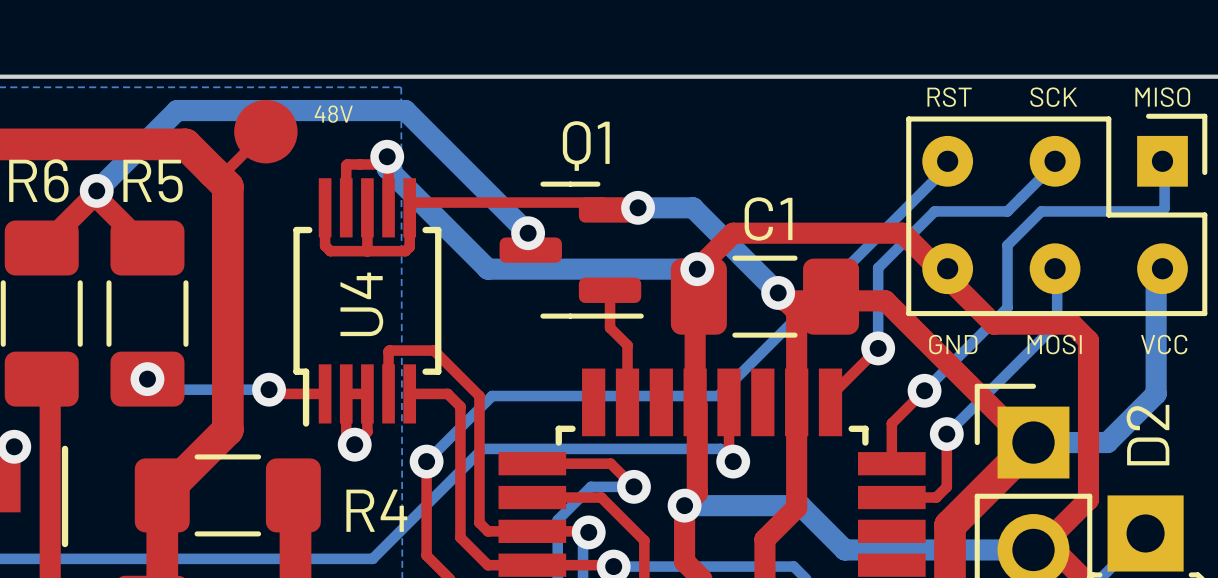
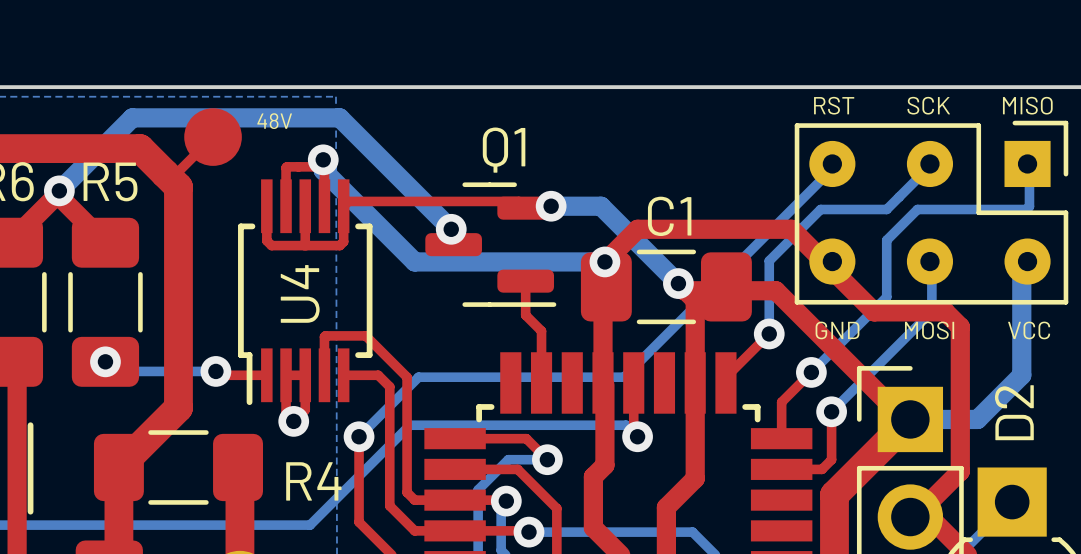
bottom track: (684, 505) (800, 505) (844, 549) (1033, 549) -> none
via: (684, 505) -> none

